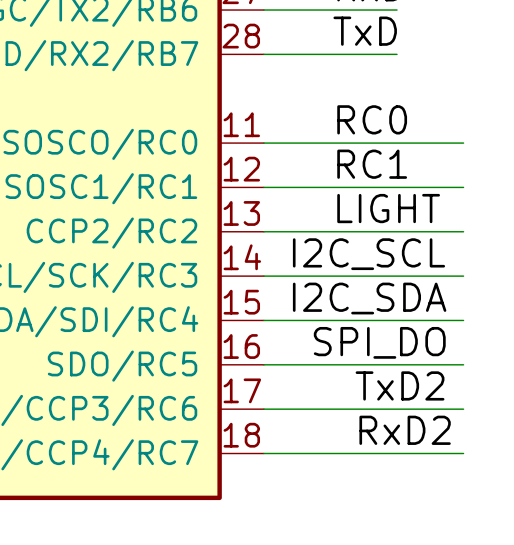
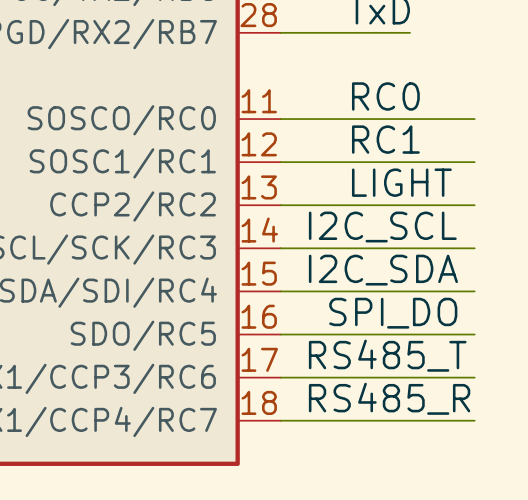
label: TxD2 (400, 385) -> none
label: none -> RS485_T (387, 355)
label: none -> RS485_R (389, 398)
label: RxD2 (405, 430) -> none

